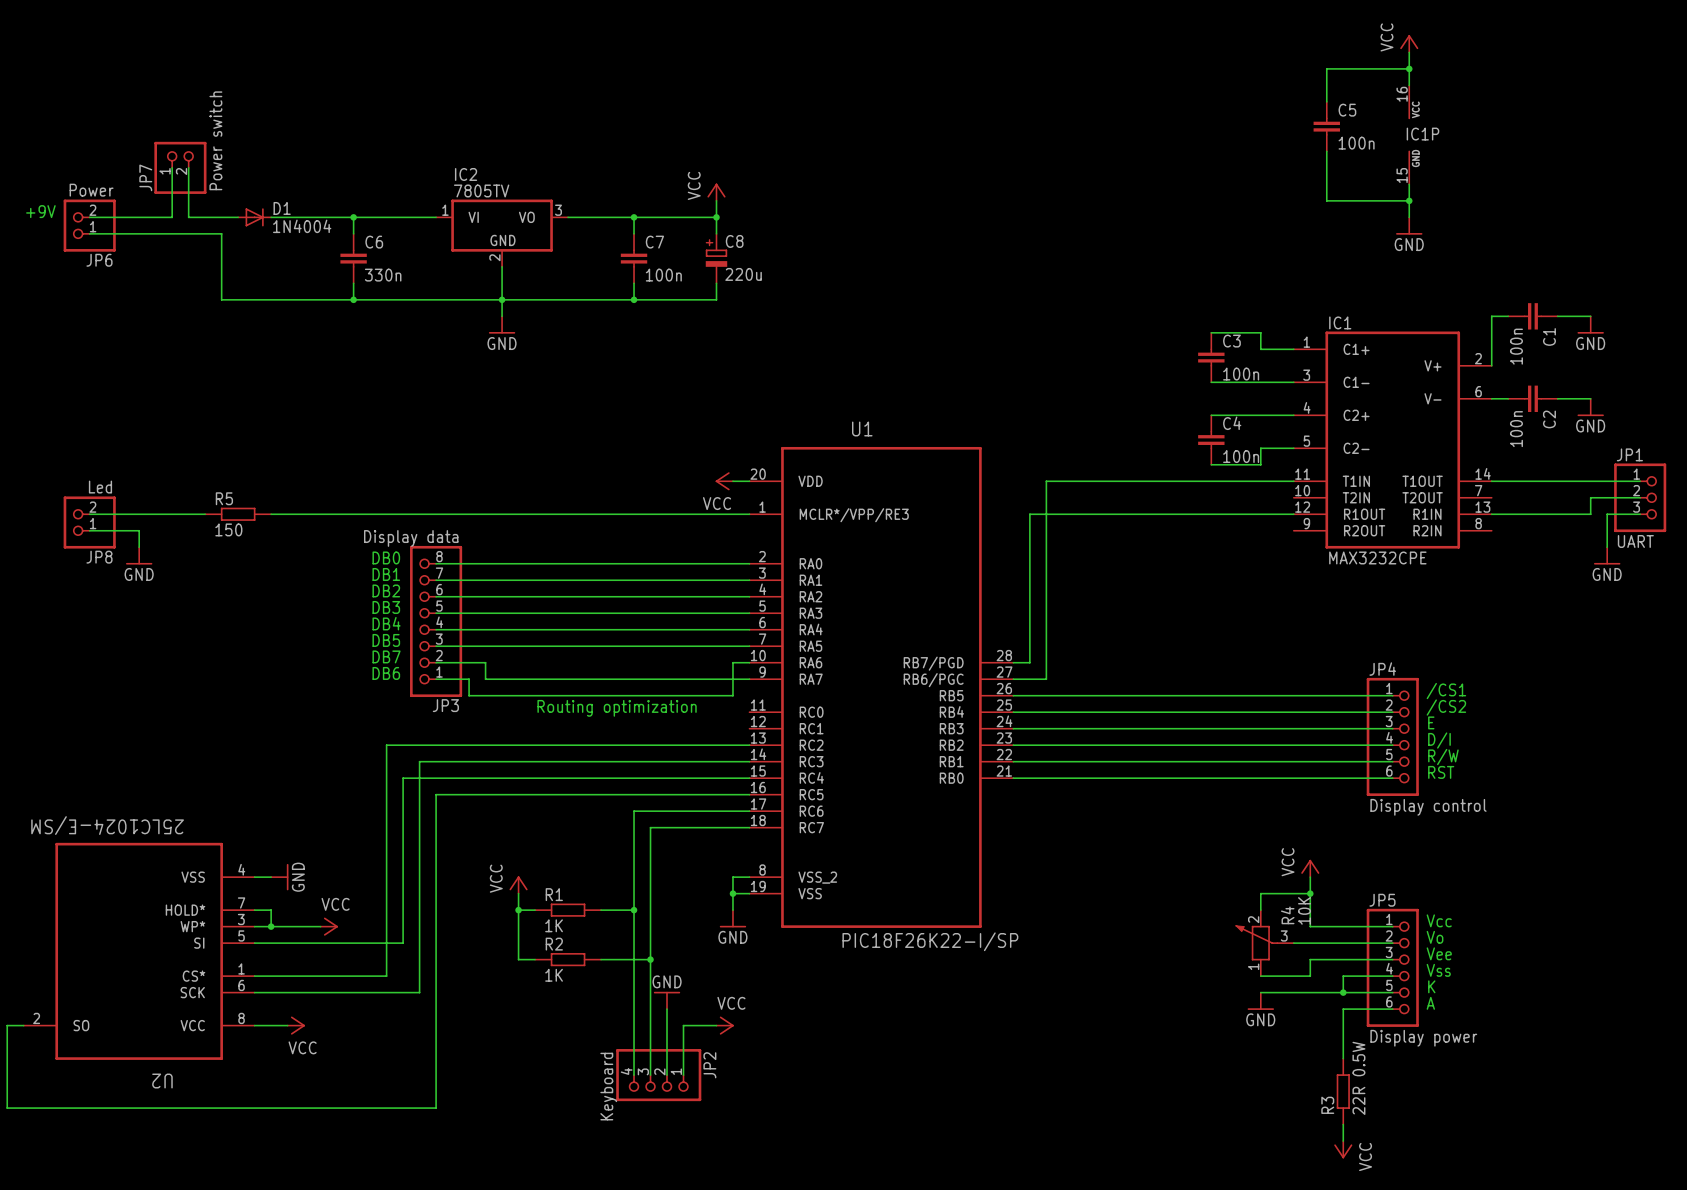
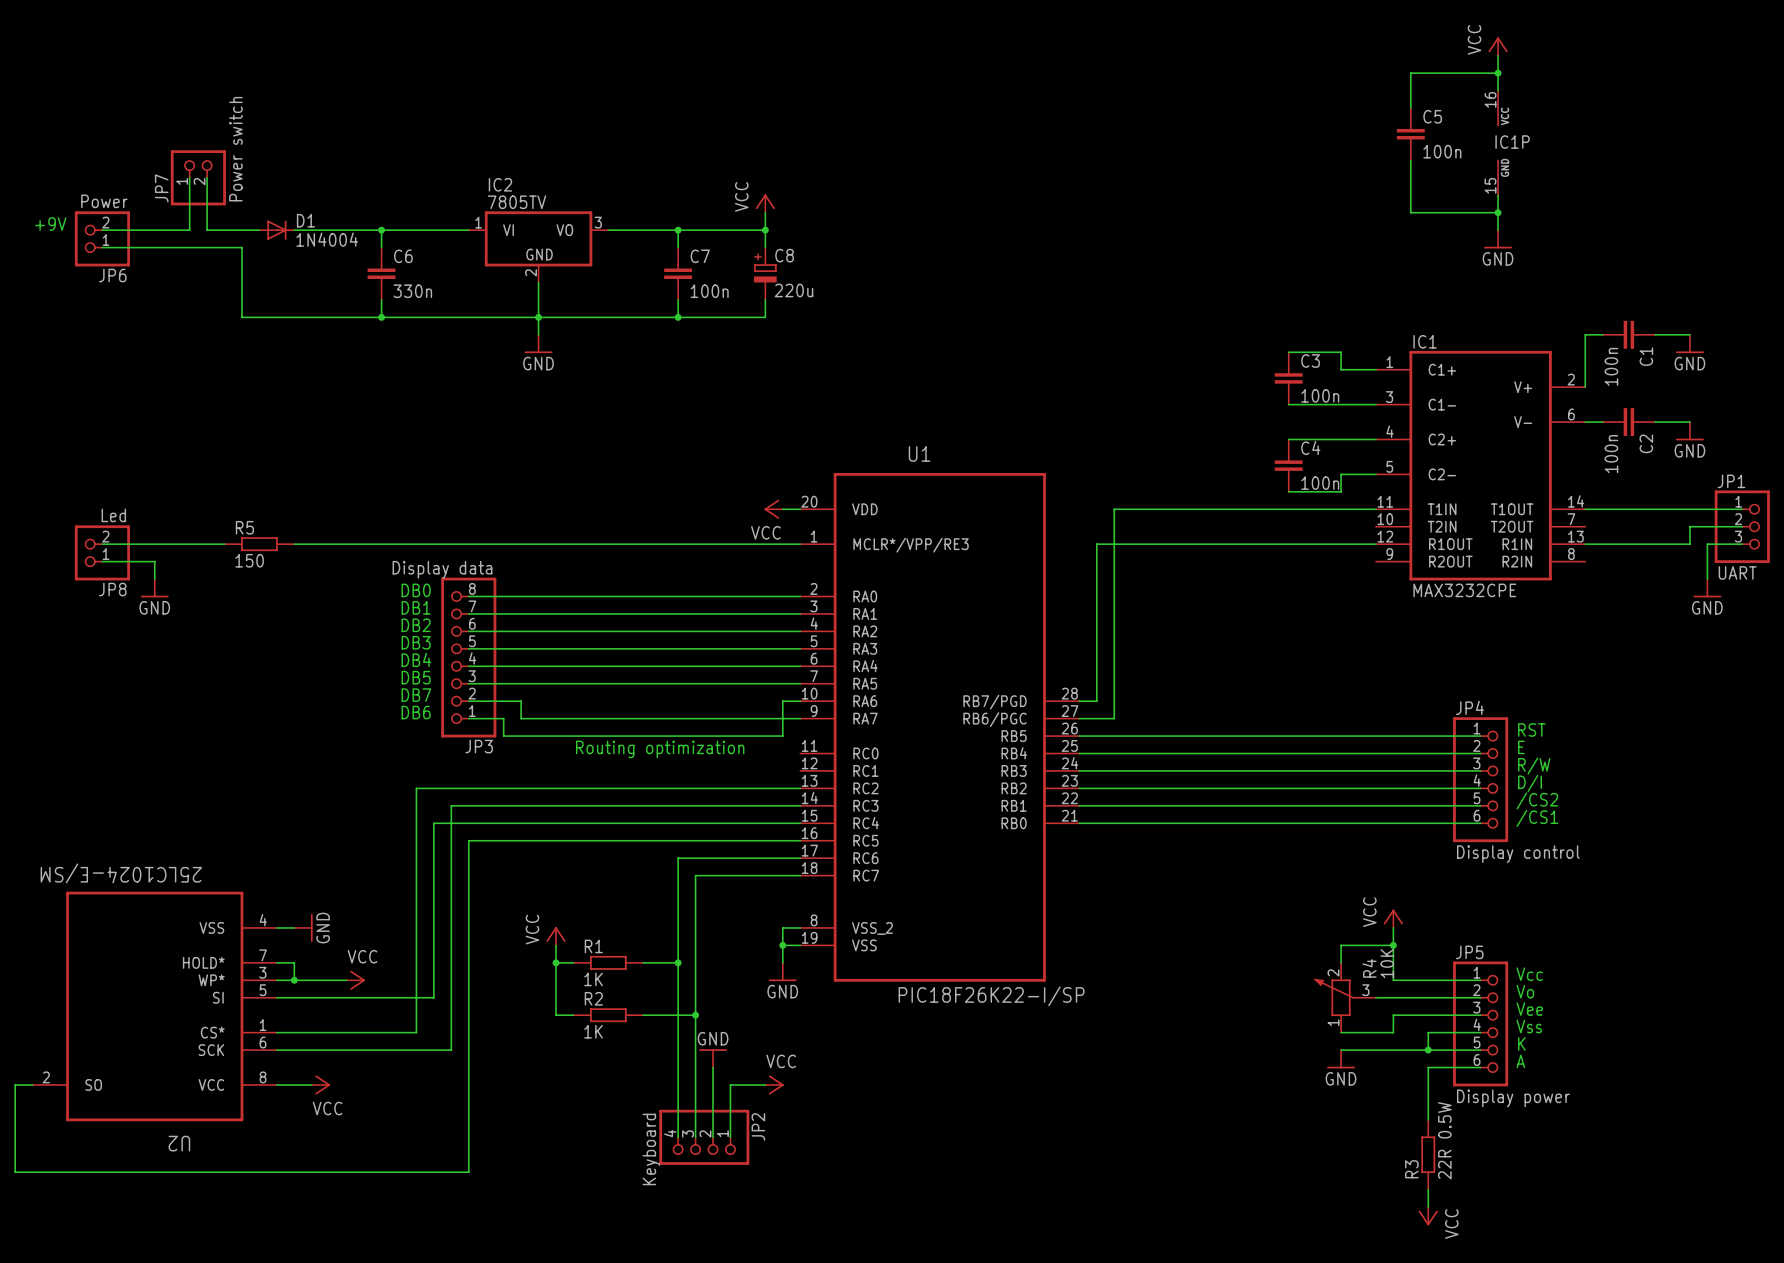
text: /CS1 (1446, 691) -> RST (1531, 729)
text: /CS2 (1446, 707) -> E (1521, 747)
text: E (1431, 722) -> R/W (1534, 766)
text: R/W (1443, 757) -> /CS2 (1537, 800)
text: RST (1441, 772) -> /CS1 (1537, 818)

